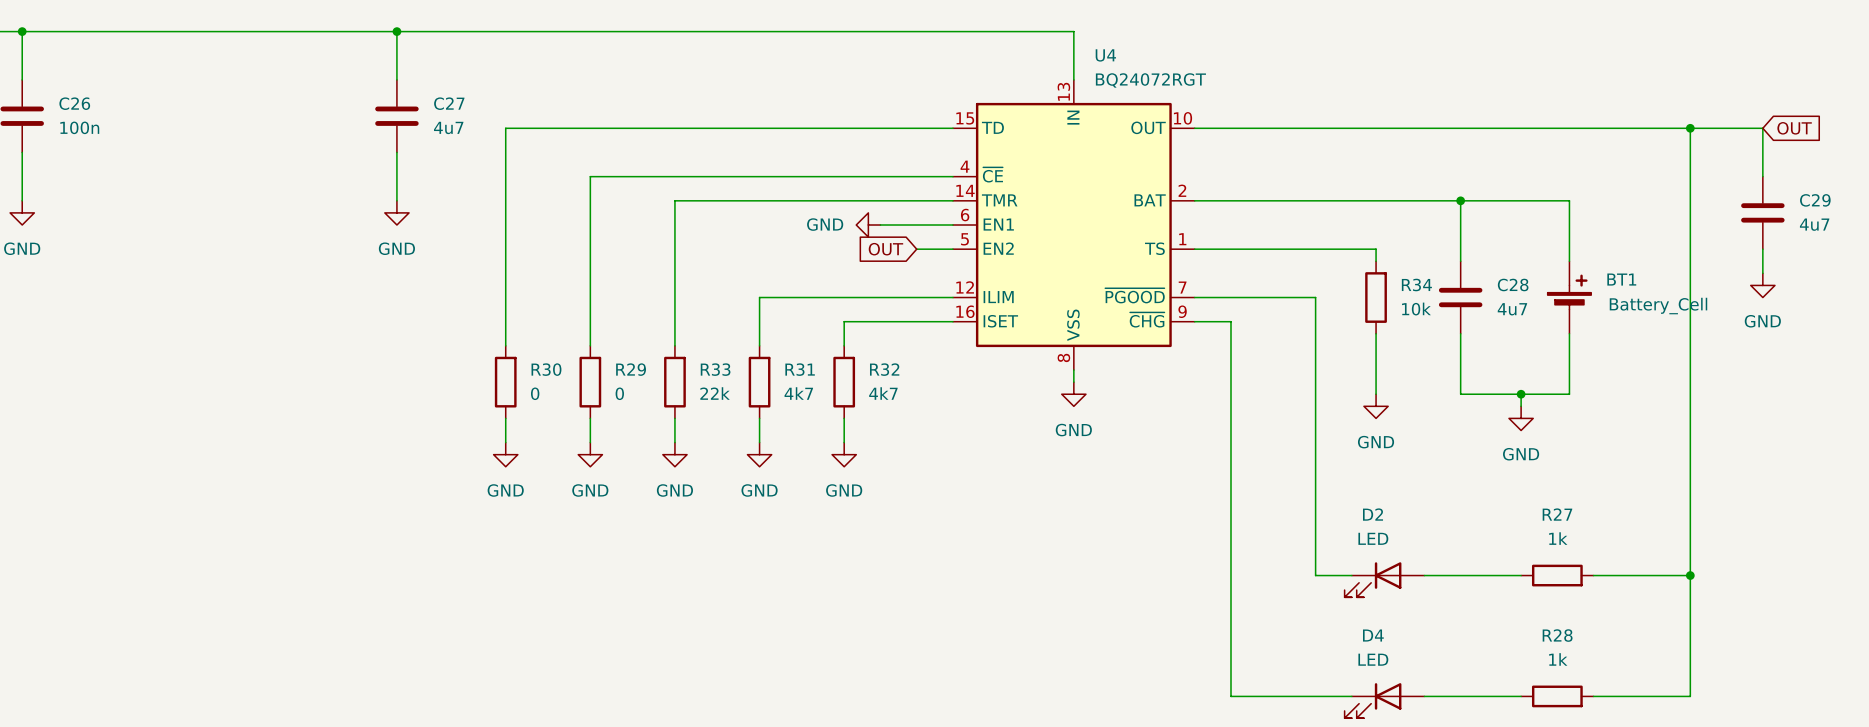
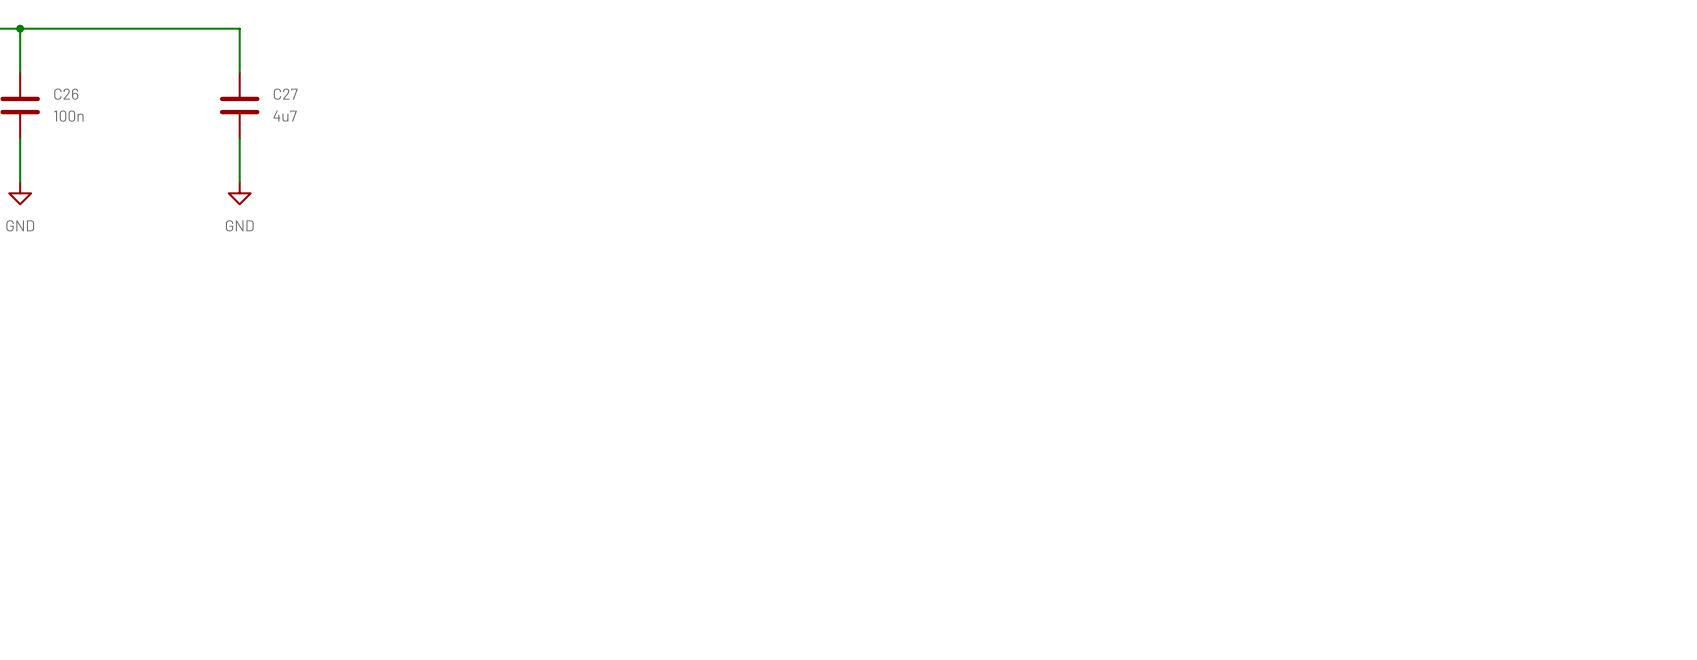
wire: (263, 31) (1073, 31) (1073, 79) -> (239, 28) (239, 72)
wire: (396, 31) (396, 79) -> none
junction: (396, 31) -> none
C27 position: (396, 116) -> (239, 105)
wire: (952, 128) (505, 128) (505, 345) -> none
wire: (1194, 128) (1762, 128) (1762, 176) -> none
wire: (1690, 128) (1690, 696) (1593, 696) -> none
junction: (1690, 128) -> none
global label: OUT (1794, 128) -> none
wire: (396, 152) (396, 200) -> (239, 138) (239, 182)
wire: (952, 176) (590, 176) (590, 345) -> none
wire: (952, 200) (674, 200) (674, 345) -> none
wire: (1194, 200) (1569, 200) (1569, 261) -> none
wire: (1460, 200) (1460, 261) -> none
junction: (1460, 200) -> none
power symbol position: GND (396, 212) -> GND (239, 193)
C29: 4u7 (1762, 212) -> none
power symbol: GND (868, 225) -> none
wire: (880, 225) (952, 225) -> none
U4: BQ24072RGT (1073, 225) -> none
global label: OUT (885, 249) -> none
wire: (916, 249) (952, 249) -> none
wire: (1194, 249) (1376, 249) (1376, 261) -> none
wire: (1762, 249) (1762, 273) -> none
power symbol: GND (1762, 285) -> none
wire: (952, 297) (759, 297) (759, 345) -> none
wire: (1194, 297) (1315, 297) (1315, 575) (1351, 575) -> none
R34: 10k (1376, 297) -> none
C28: 4u7 (1460, 297) -> none
BT1: Battery_Cell (1569, 297) -> none
wire: (952, 321) (844, 321) (844, 345) -> none
wire: (1194, 321) (1230, 321) (1230, 696) (1351, 696) -> none
wire: (1376, 333) (1376, 394) -> none
wire: (1460, 333) (1460, 394) (1569, 394) (1569, 333) -> none
wire: (1073, 370) (1073, 382) -> none
R30: 0 (505, 382) -> none
R29: 0 (590, 382) -> none
R33: 22k (674, 382) -> none
R31: 4k7 (759, 382) -> none
R32: 4k7 (844, 382) -> none
power symbol: GND (1073, 394) -> none
wire: (1521, 394) (1521, 406) -> none
junction: (1521, 394) -> none
power symbol: GND (1376, 406) -> none
wire: (505, 418) (505, 442) -> none
wire: (590, 418) (590, 442) -> none
wire: (674, 418) (674, 442) -> none
wire: (759, 418) (759, 442) -> none
wire: (844, 418) (844, 442) -> none
power symbol: GND (1521, 418) -> none
power symbol: GND (505, 454) -> none
power symbol: GND (590, 454) -> none
power symbol: GND (674, 454) -> none
power symbol: GND (759, 454) -> none
power symbol: GND (844, 454) -> none
wire: (1424, 575) (1521, 575) -> none
R27: 1k (1557, 575) -> none
wire: (1593, 575) (1690, 575) -> none
junction: (1690, 575) -> none
D2: LED (1384, 579) -> none
wire: (1424, 696) (1521, 696) -> none
R28: 1k (1557, 696) -> none
D4: LED (1384, 700) -> none

